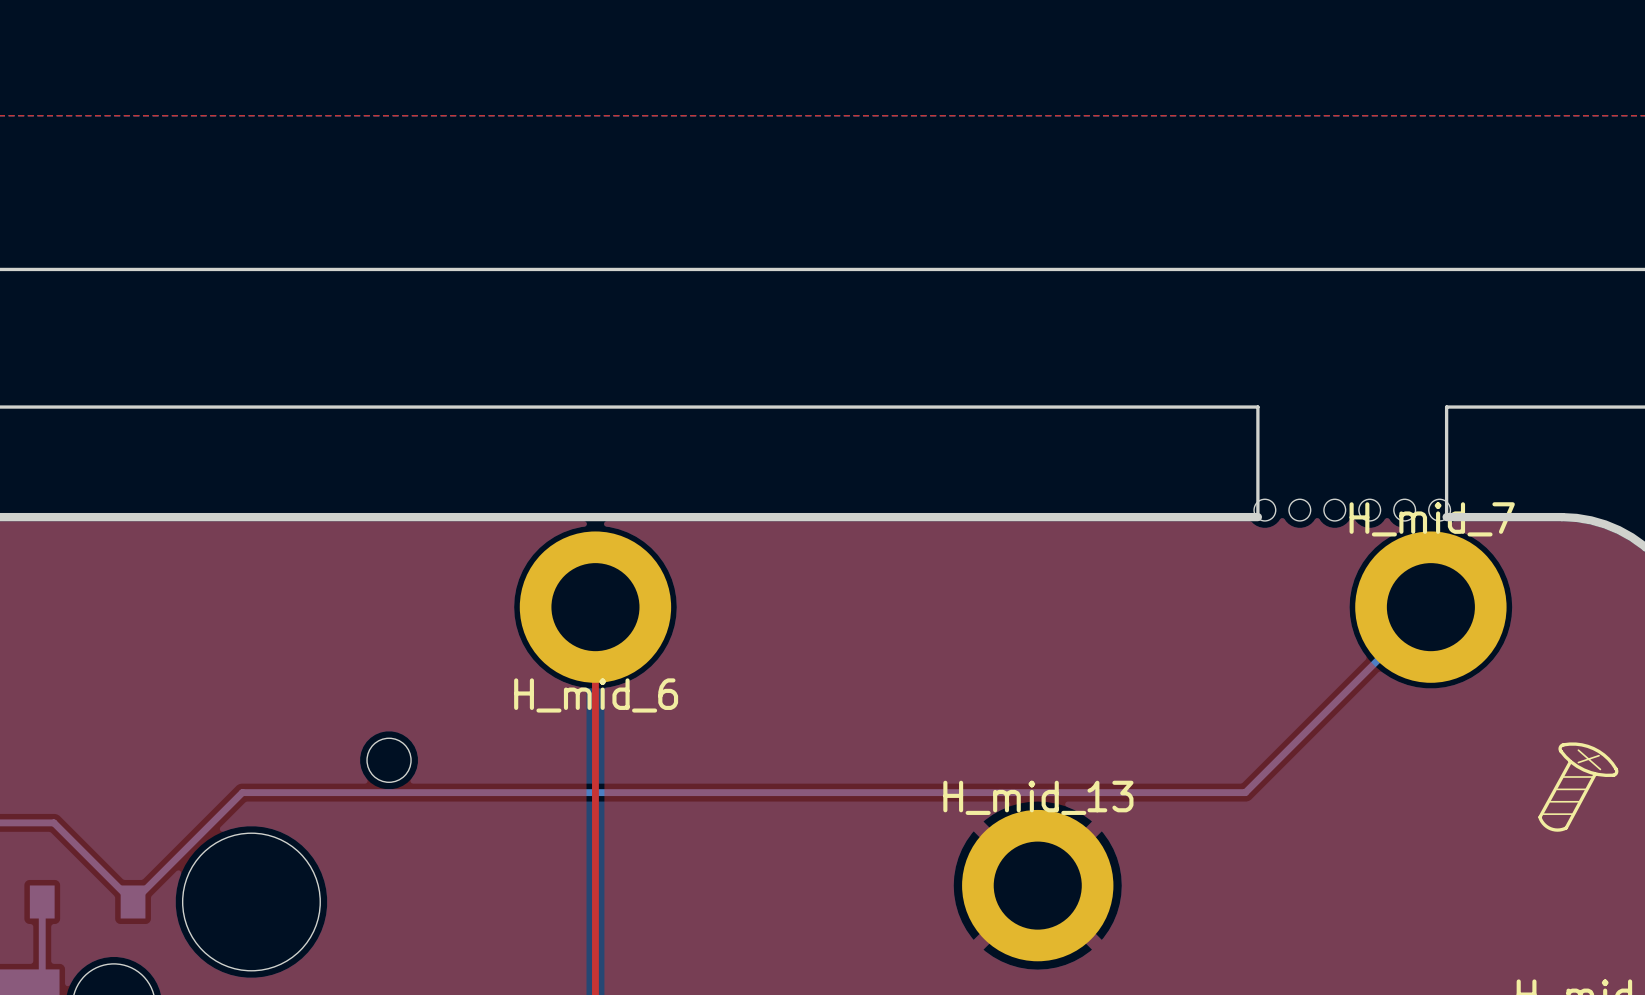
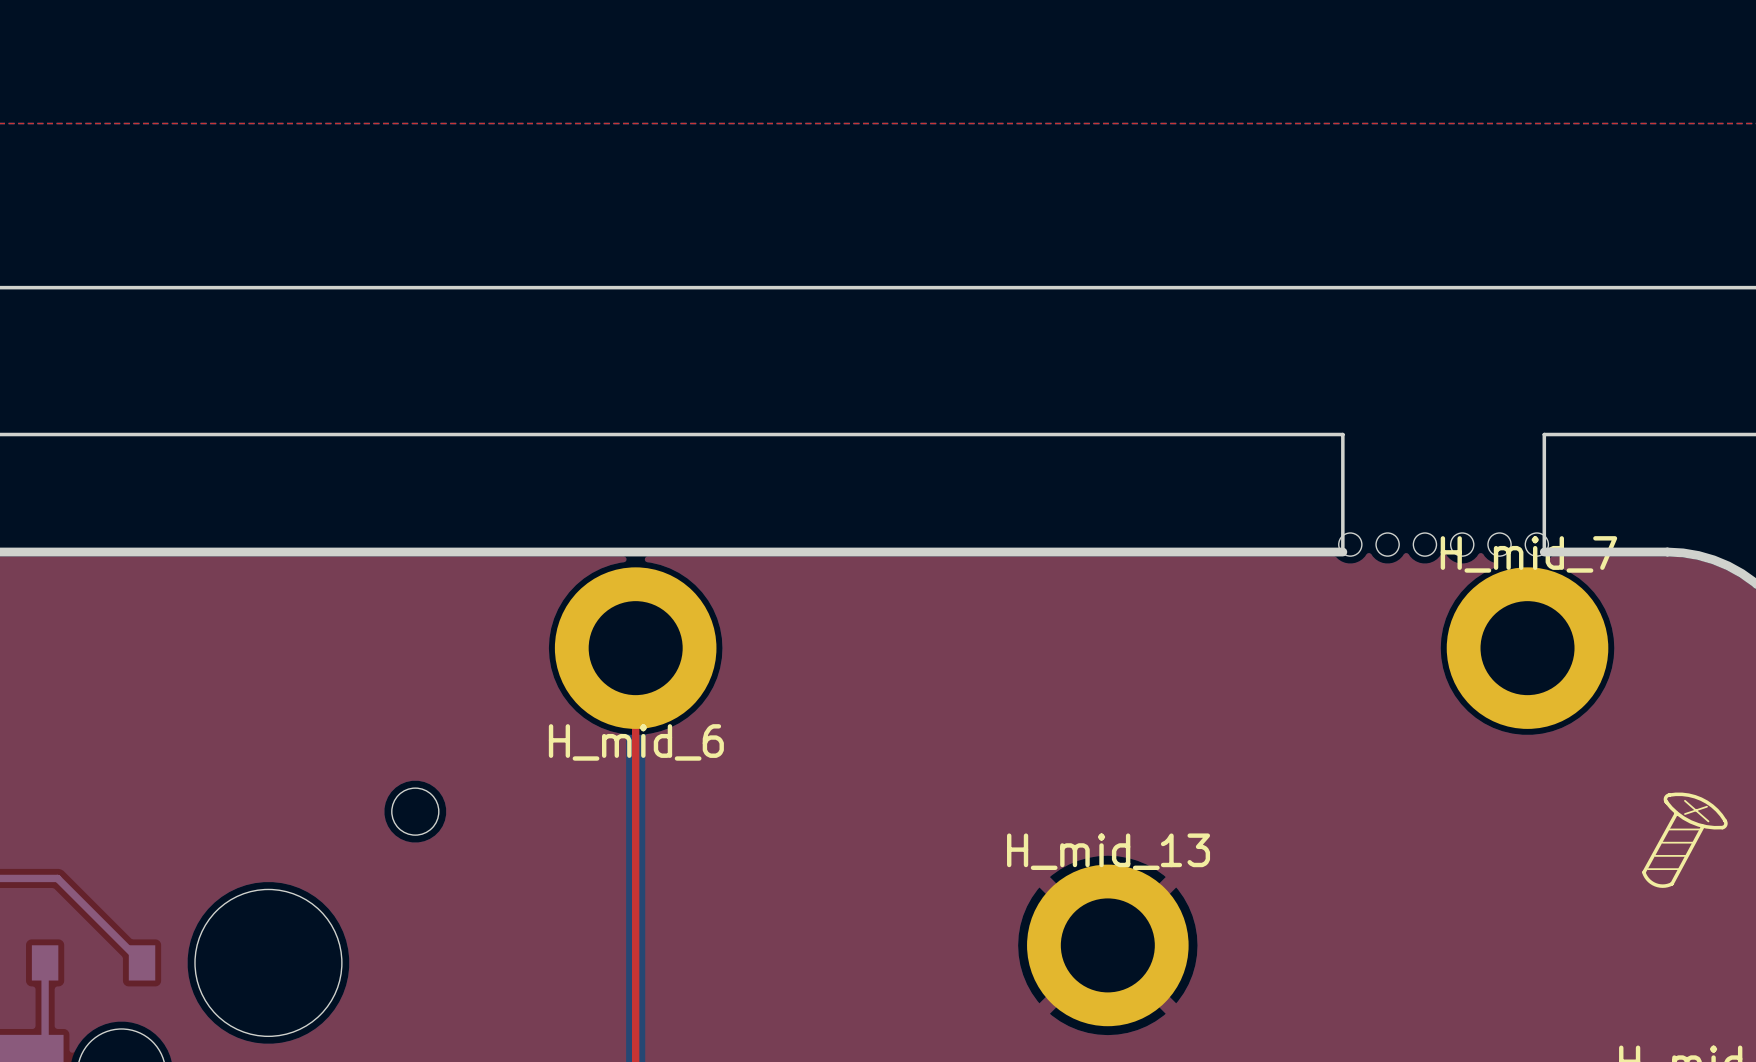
bottom track: (1430, 607) (1245, 792) (242, 792) (133, 901) -> none

